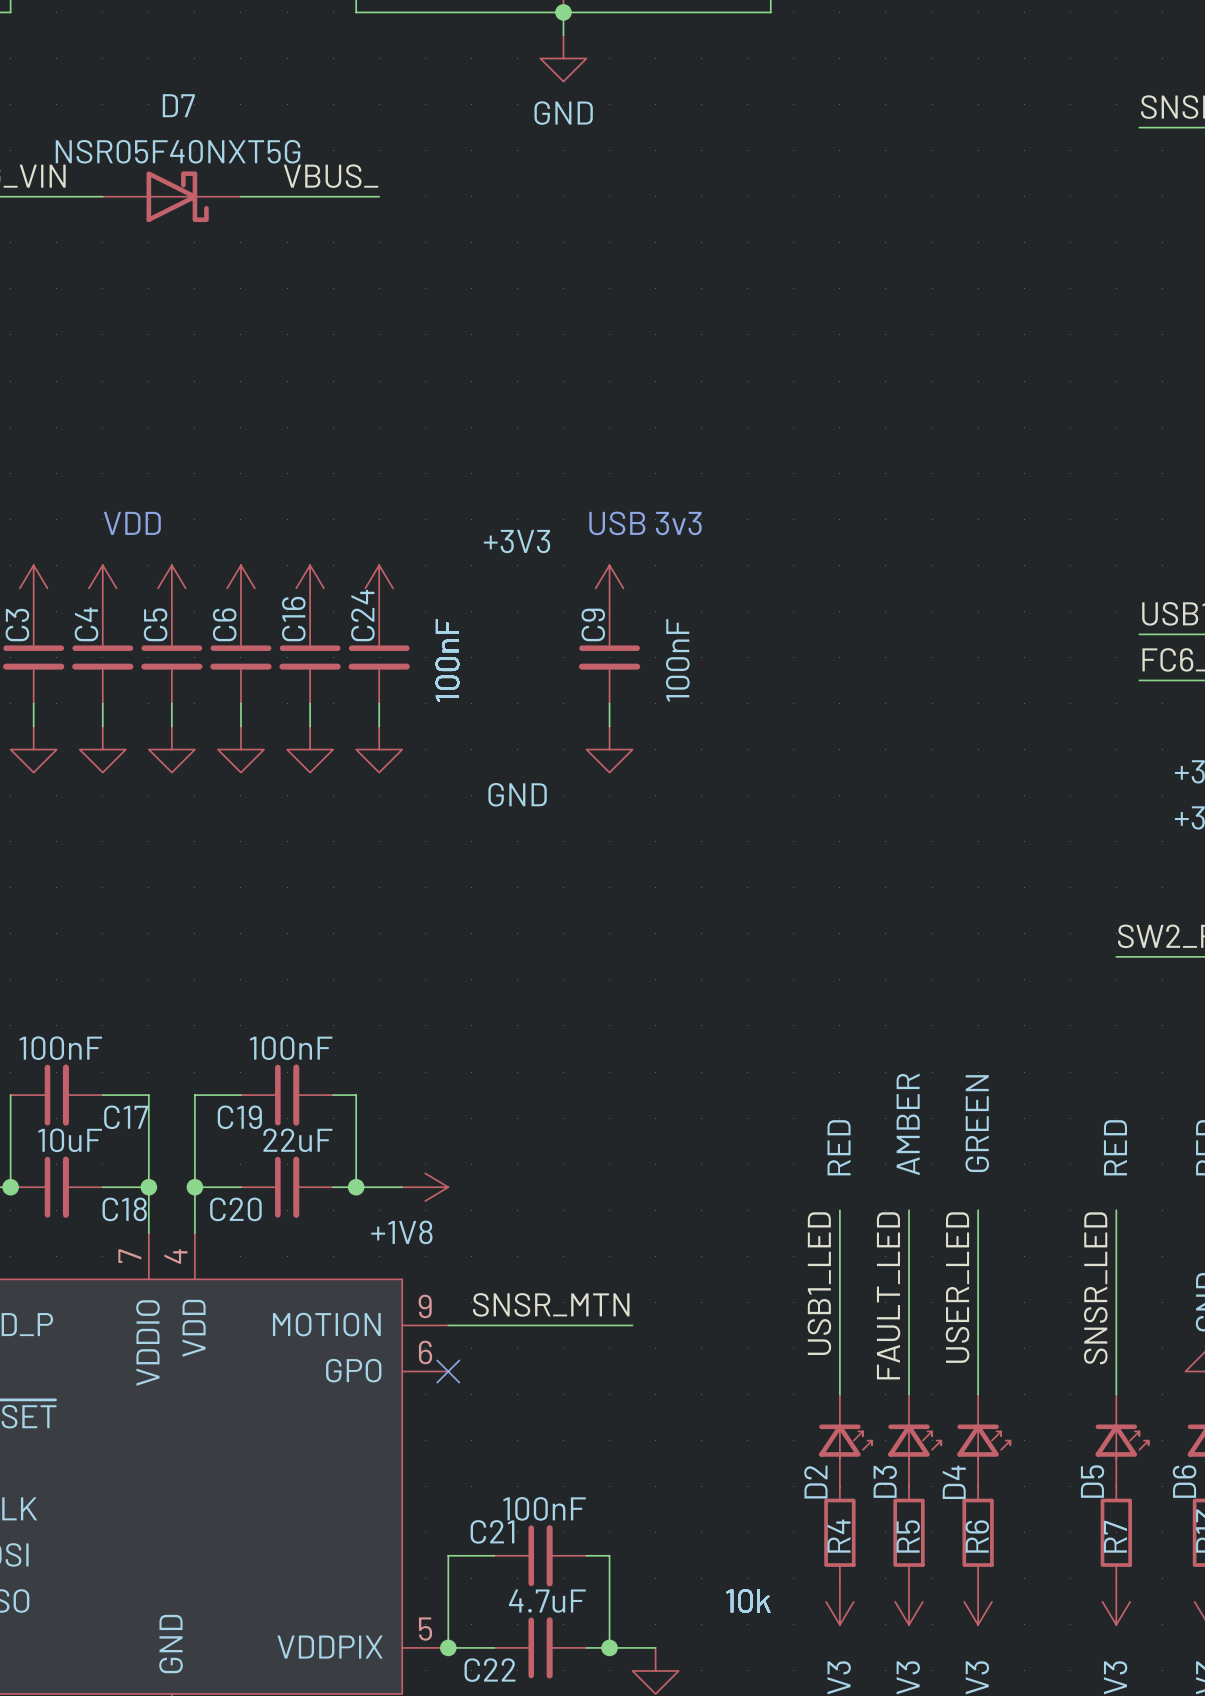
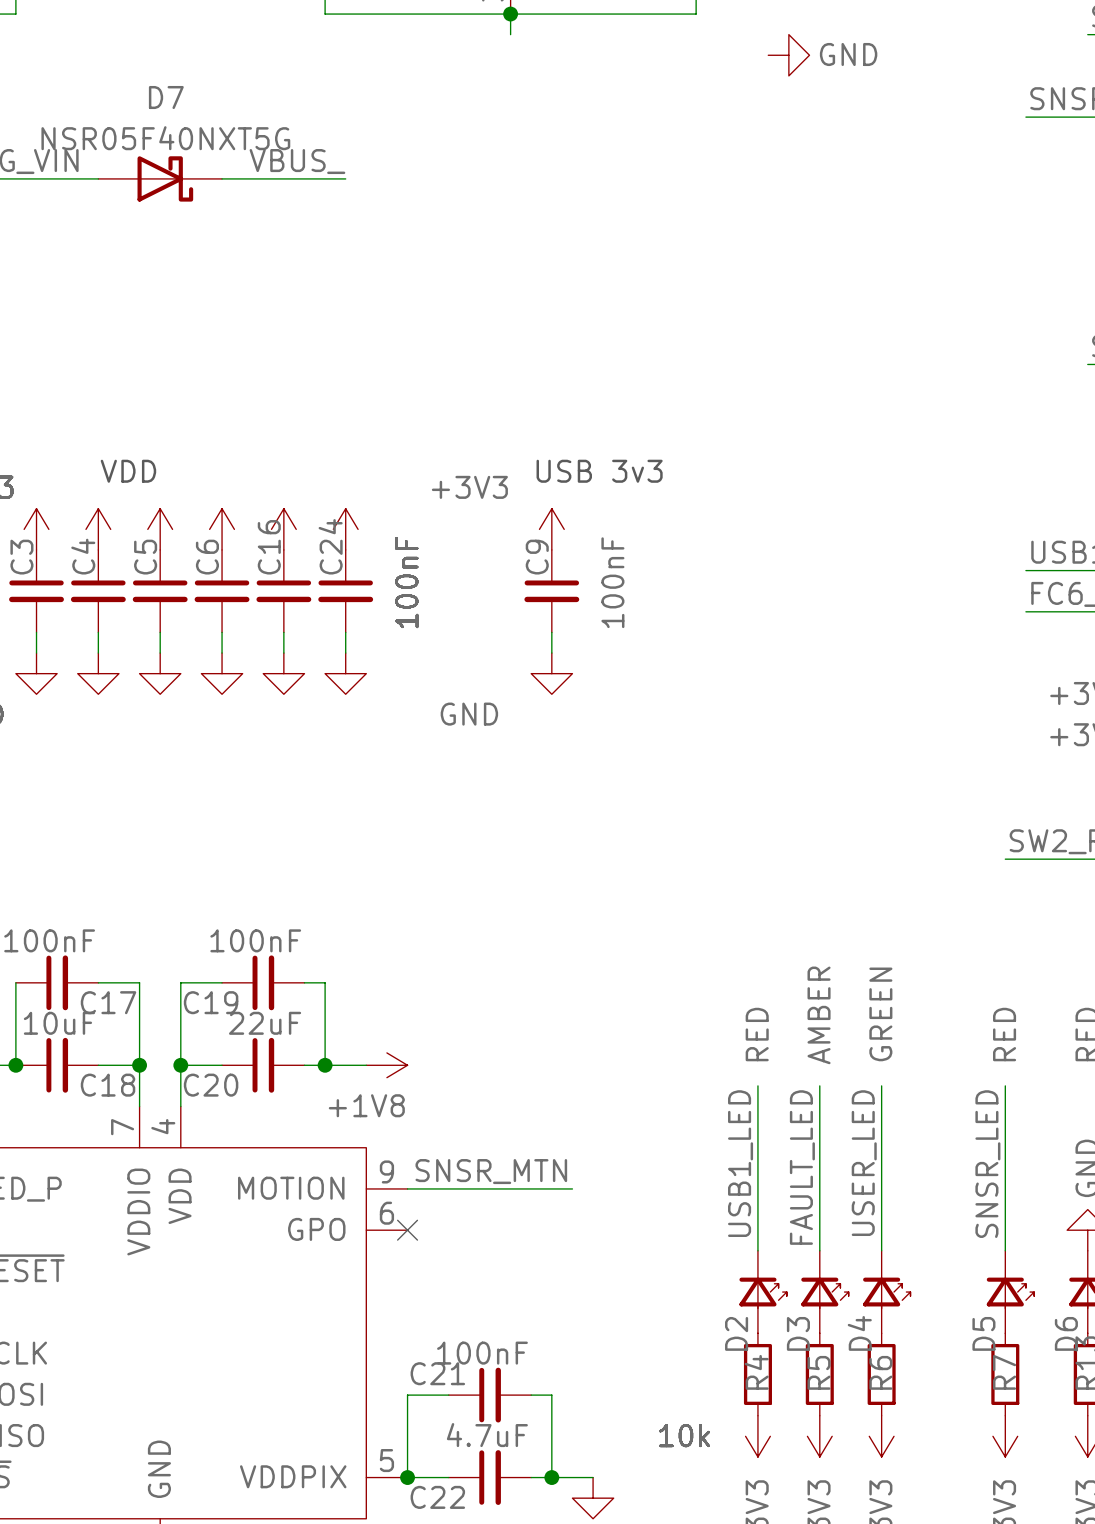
power symbol: GND (563, 58) -> none
power symbol: none -> GND (788, 55)

